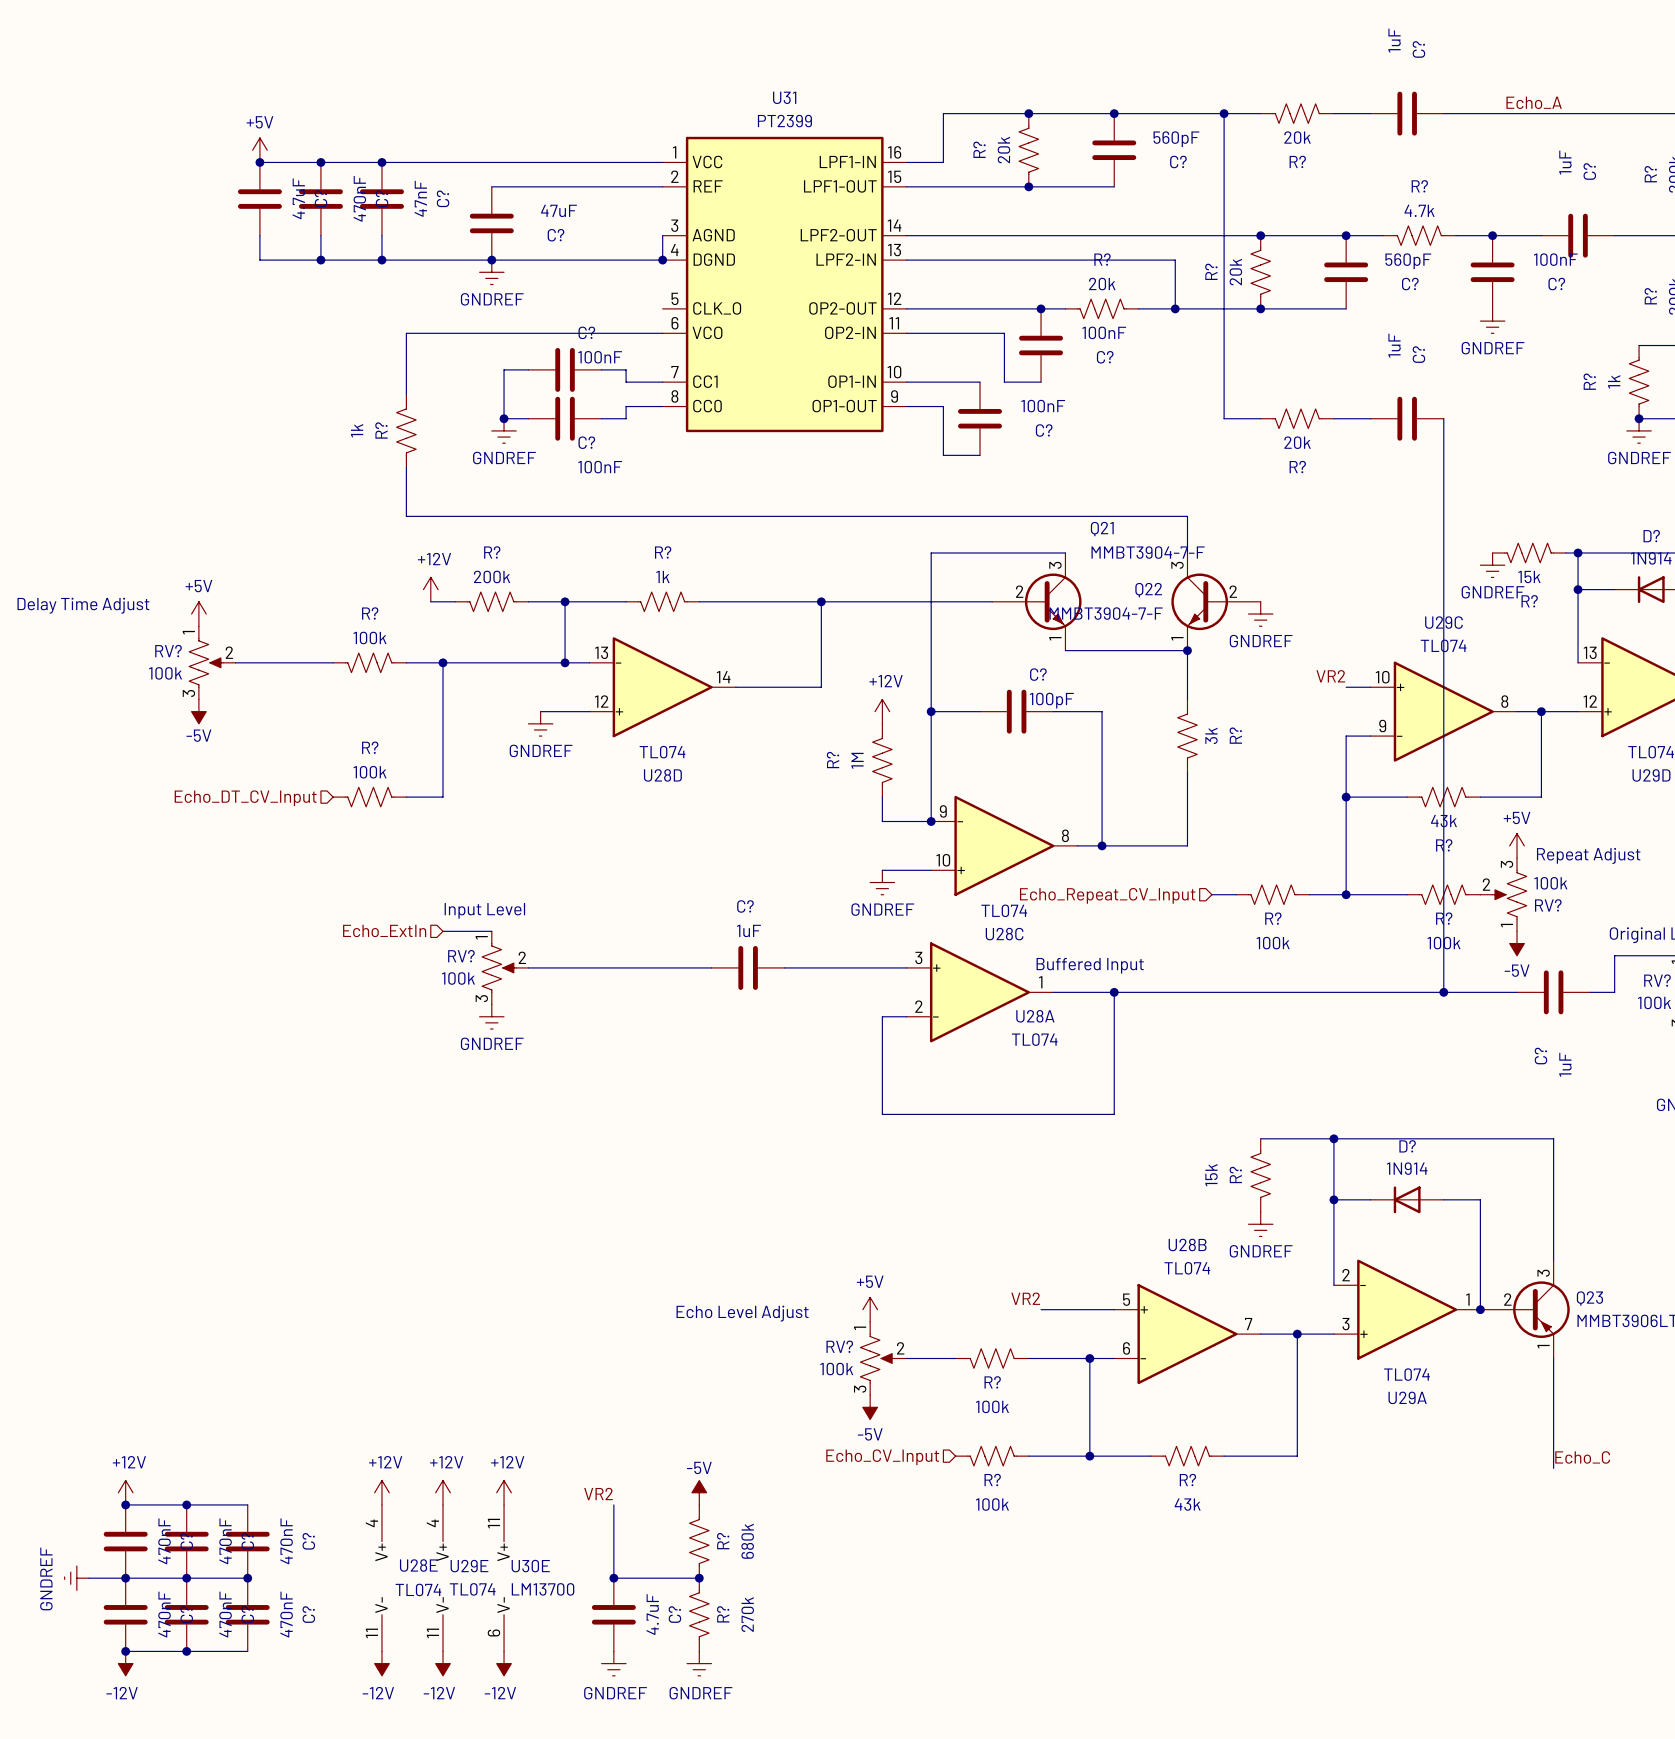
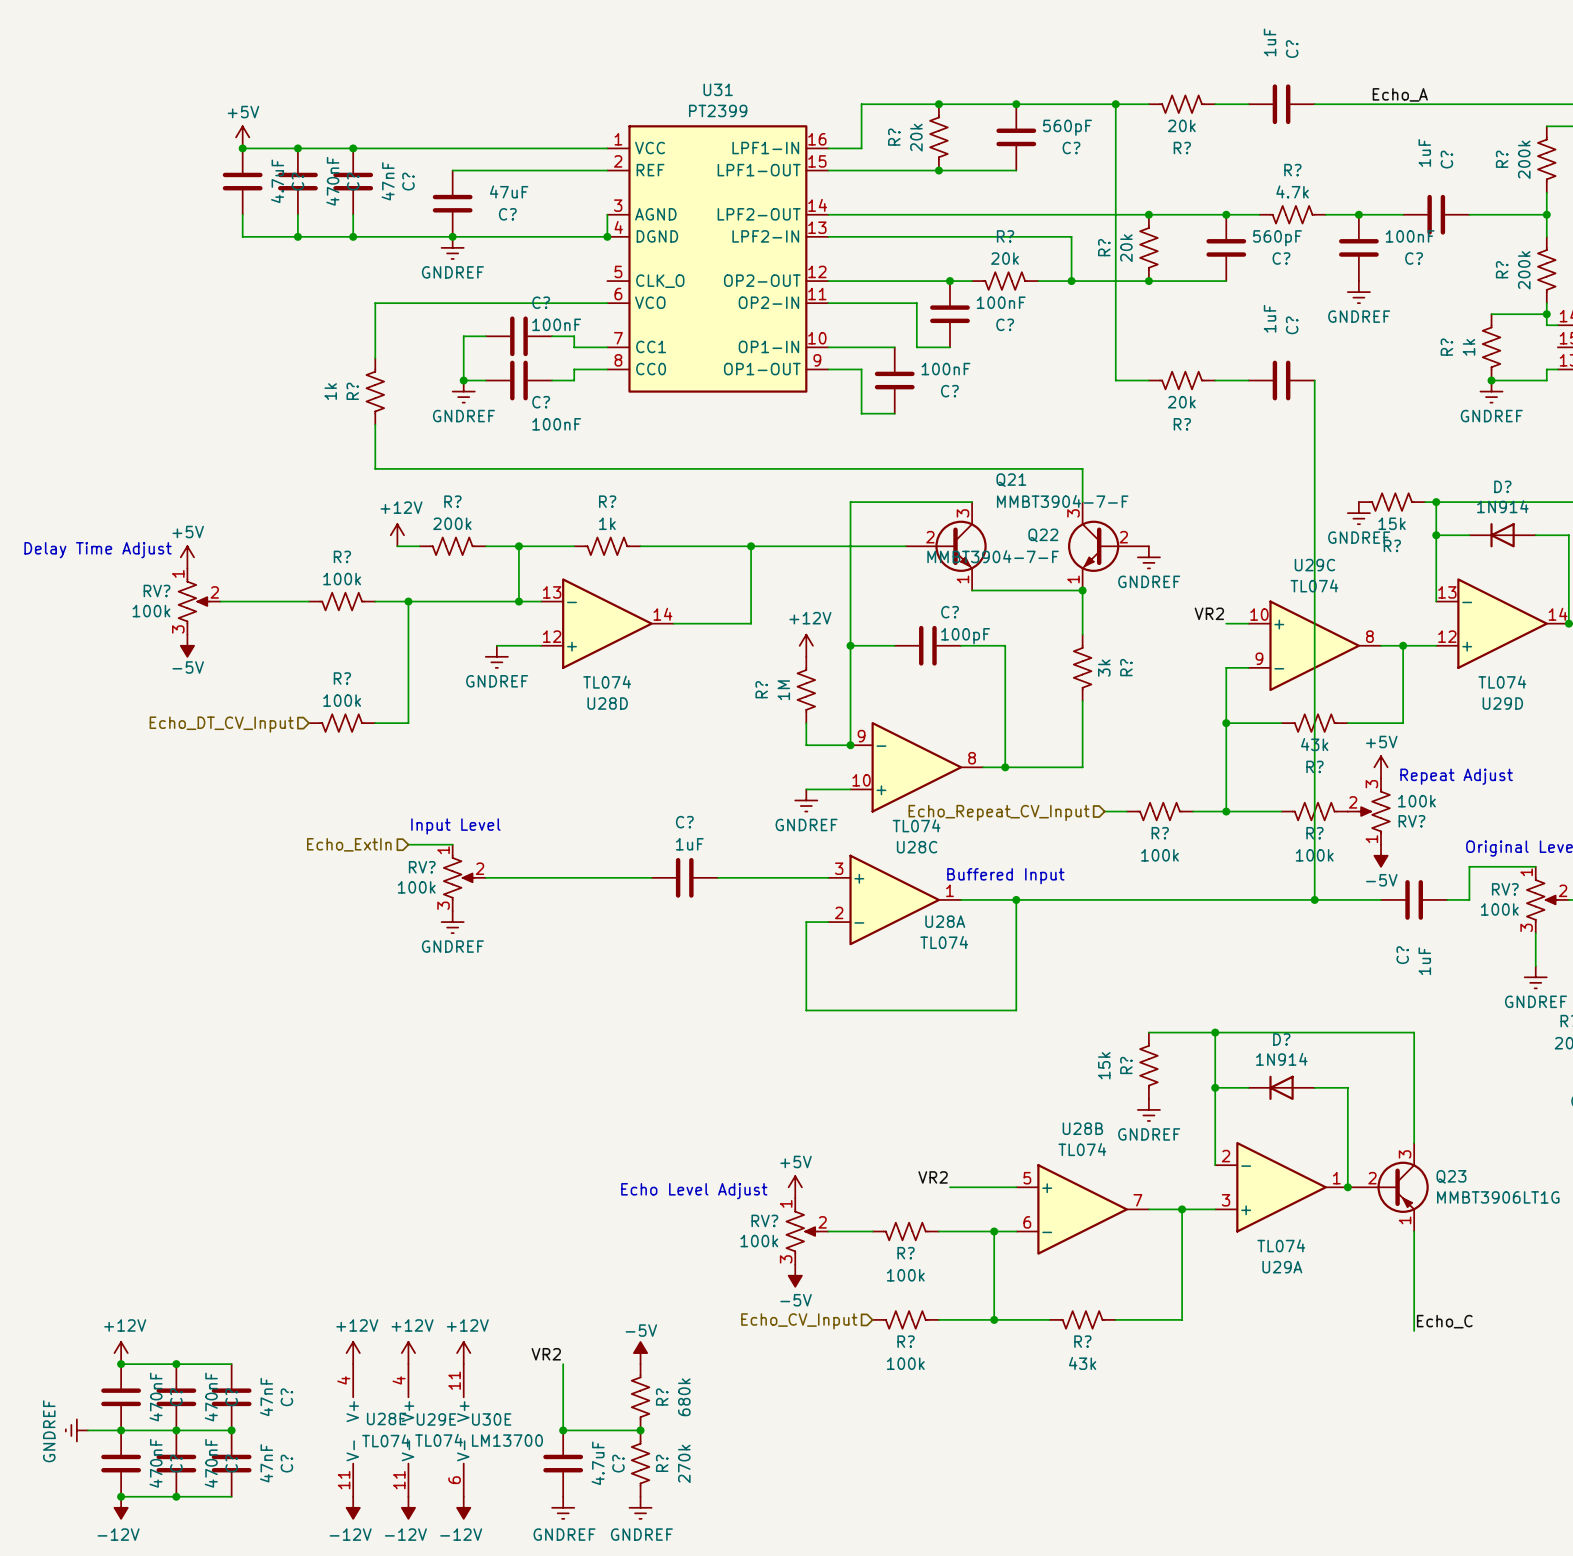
C? value: 470nF (286, 1541) -> 47nF (266, 1397)
C? value: 470nF (286, 1614) -> 47nF (266, 1463)

